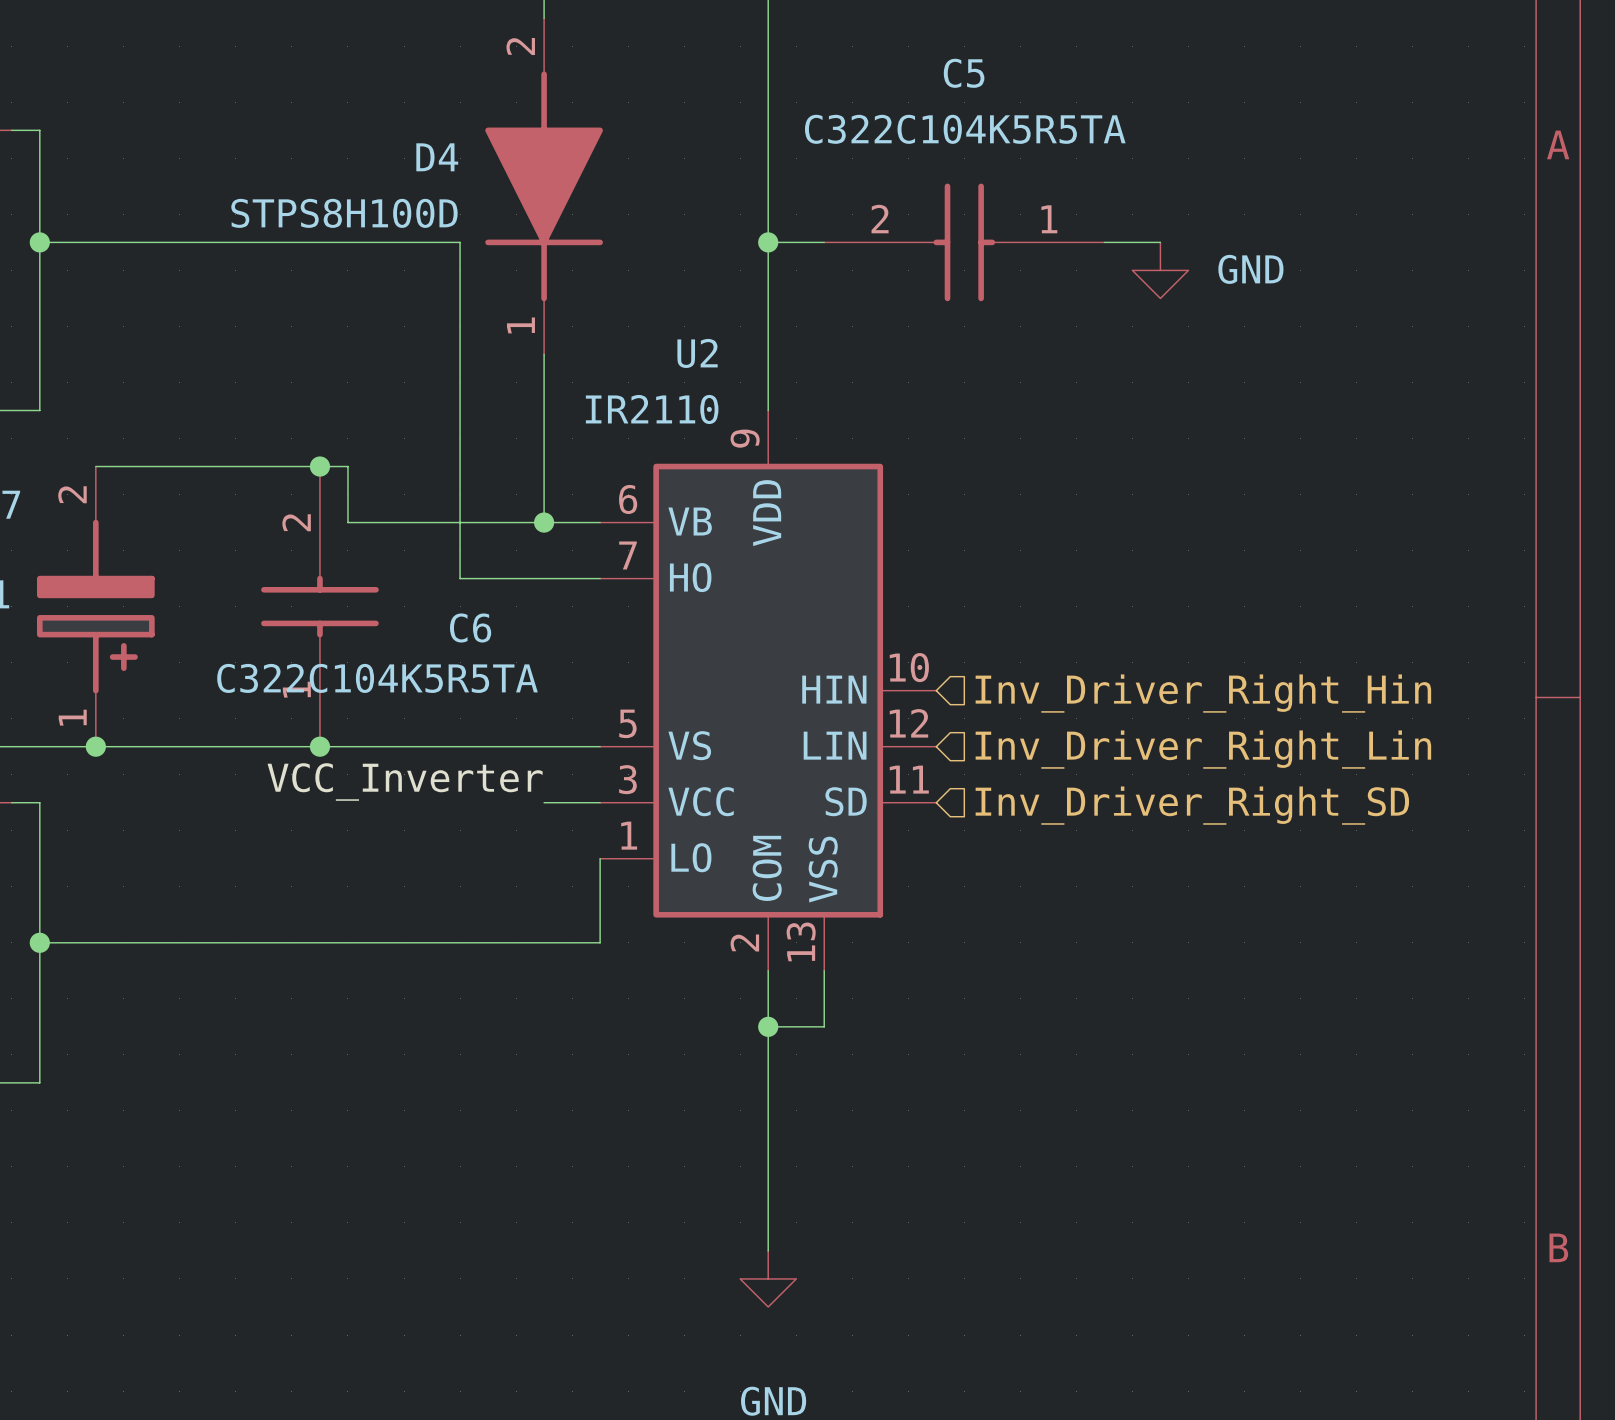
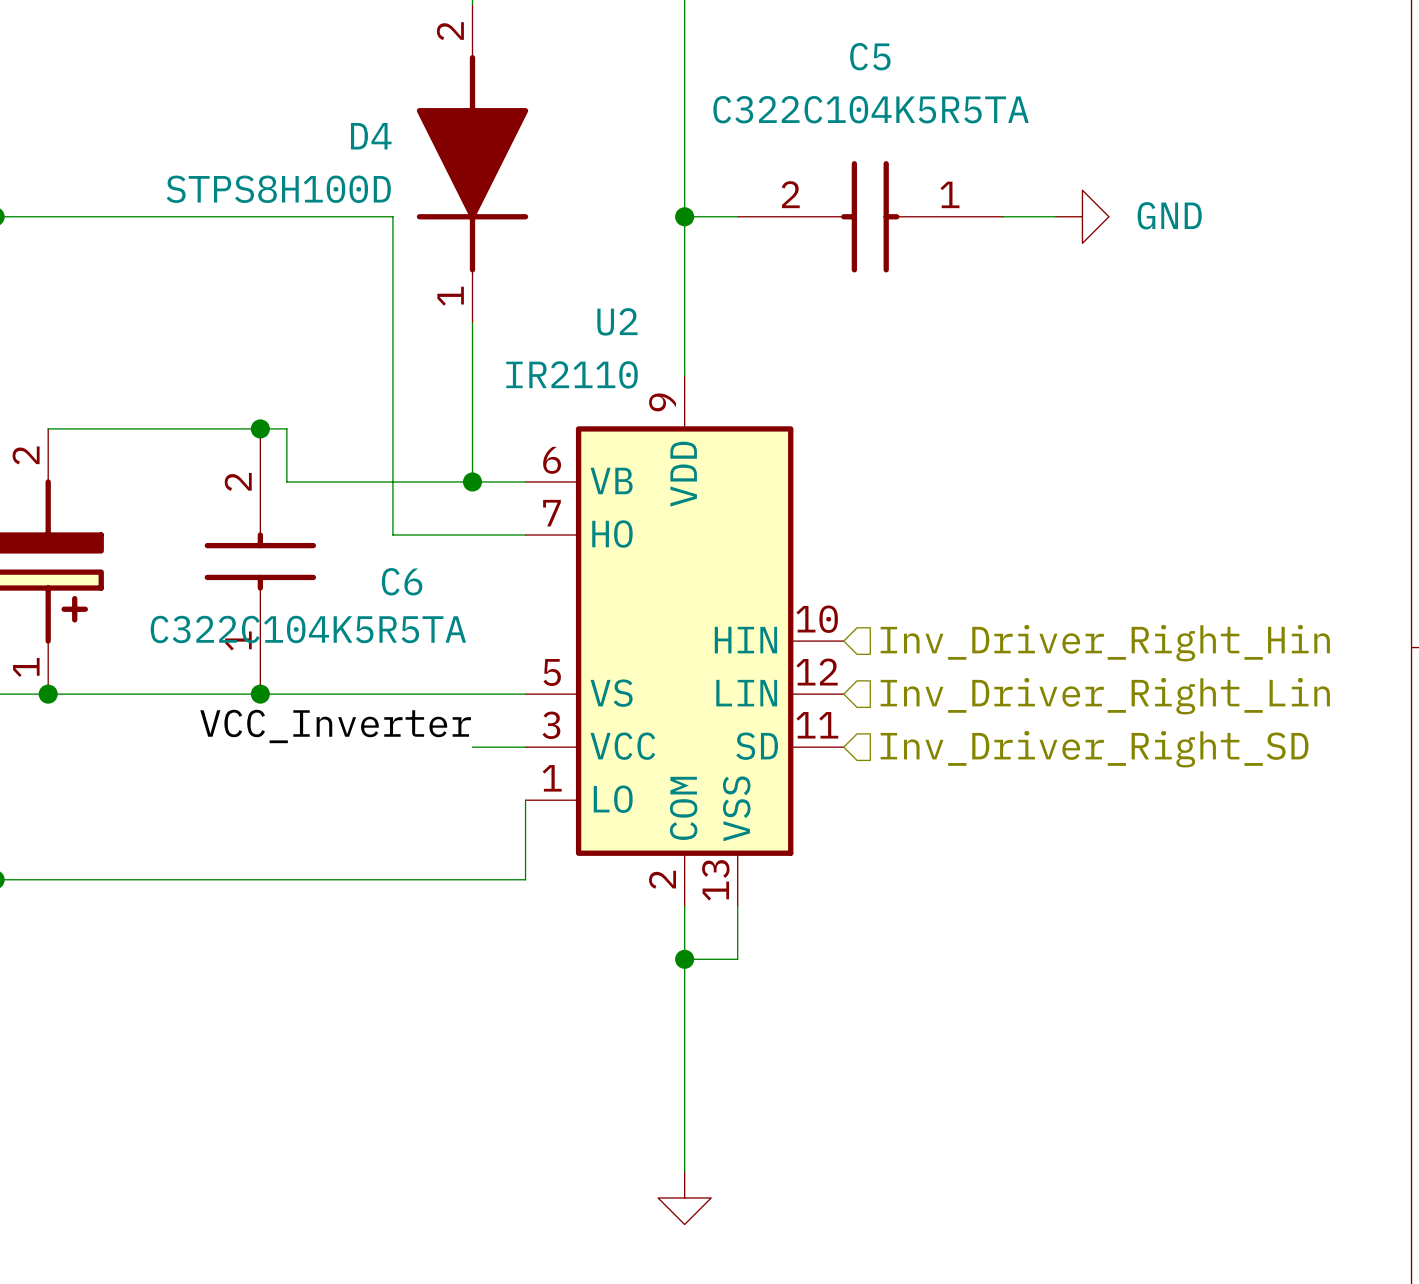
power symbol rotation: 0° (1160, 270) -> 90° counterclockwise (1082, 216)
power symbol position: GND (1160, 270) -> GND (1082, 216)

